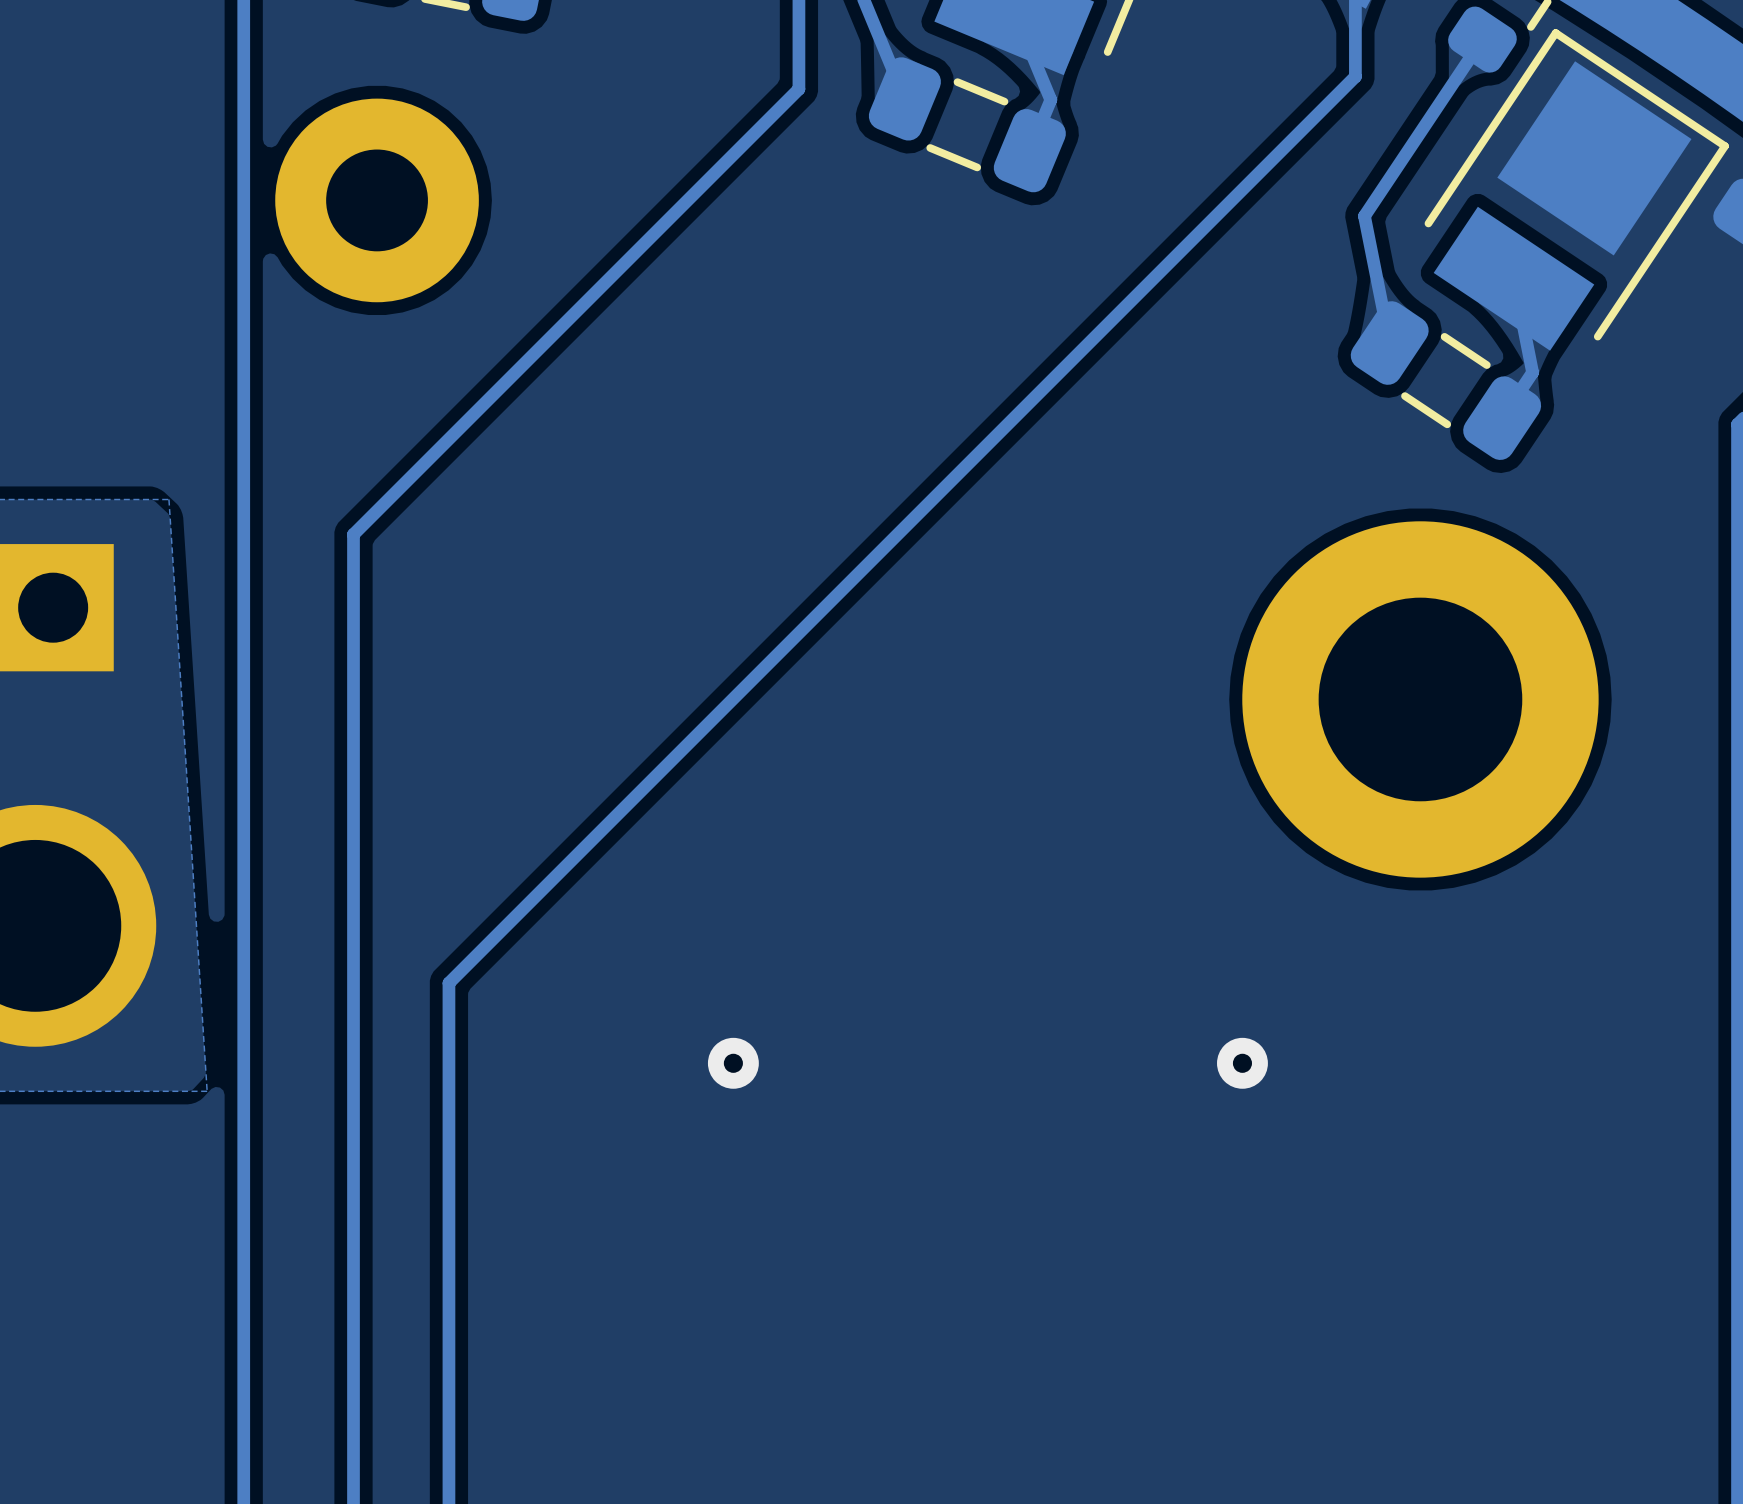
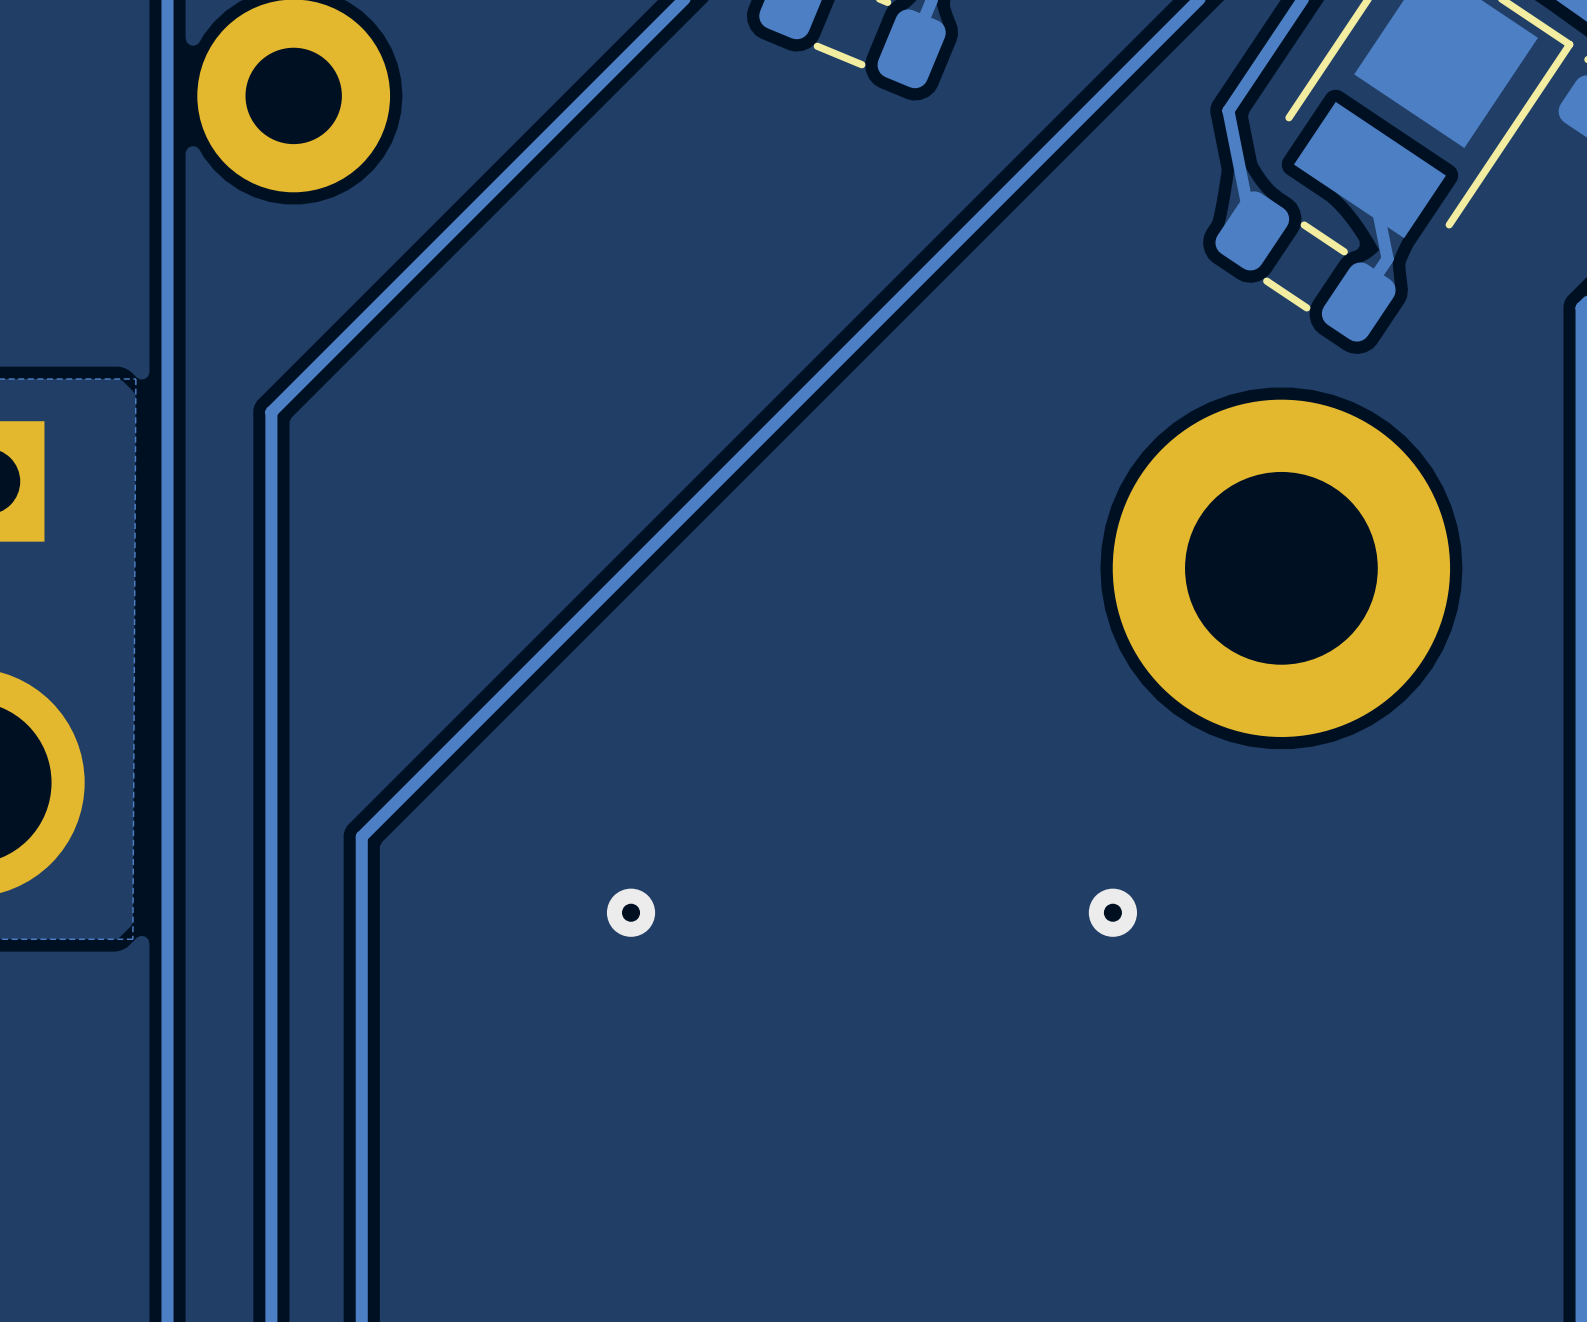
zone outline: (168, 499) (207, 1091) -> (96, 379) (135, 379) (132, 939)

